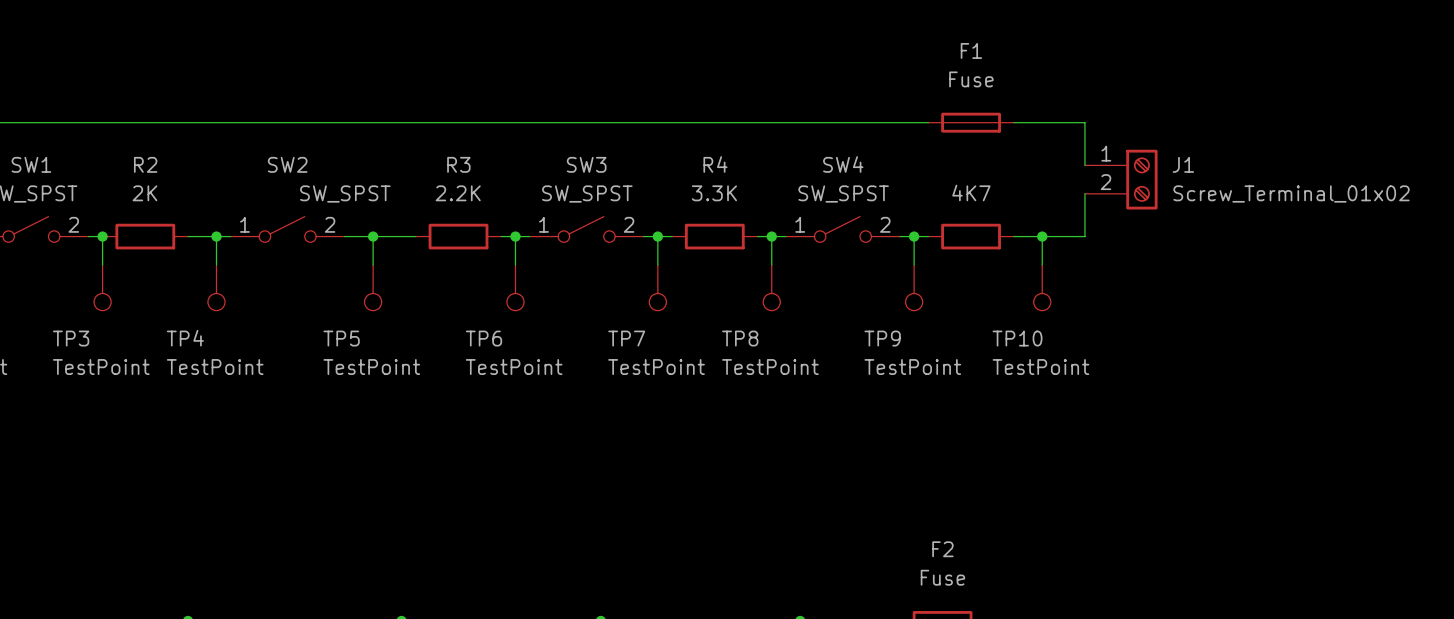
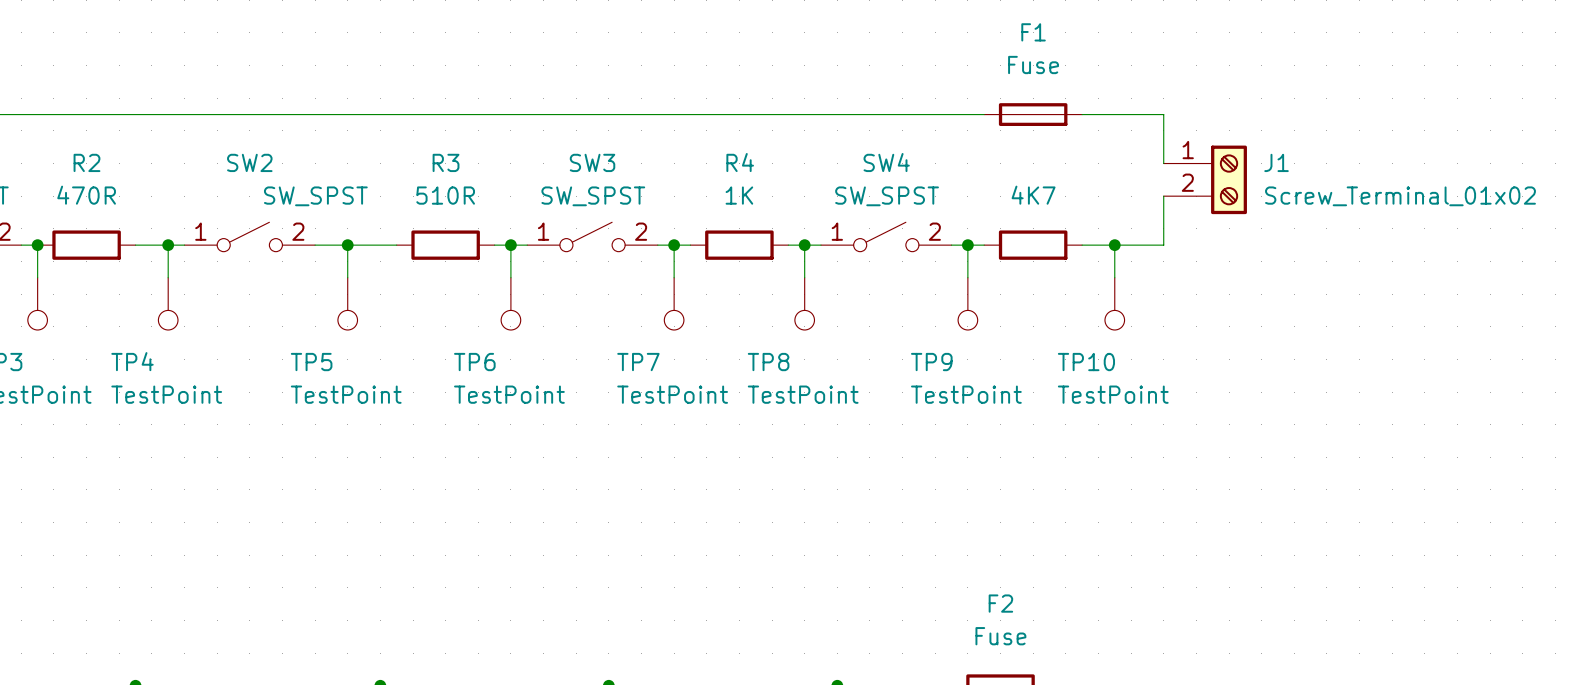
R2 value: 2K (144, 193) -> 470R (86, 195)
R3 value: 2.2K (458, 193) -> 510R (445, 195)
R4 value: 3.3K (714, 193) -> 1K (739, 195)

